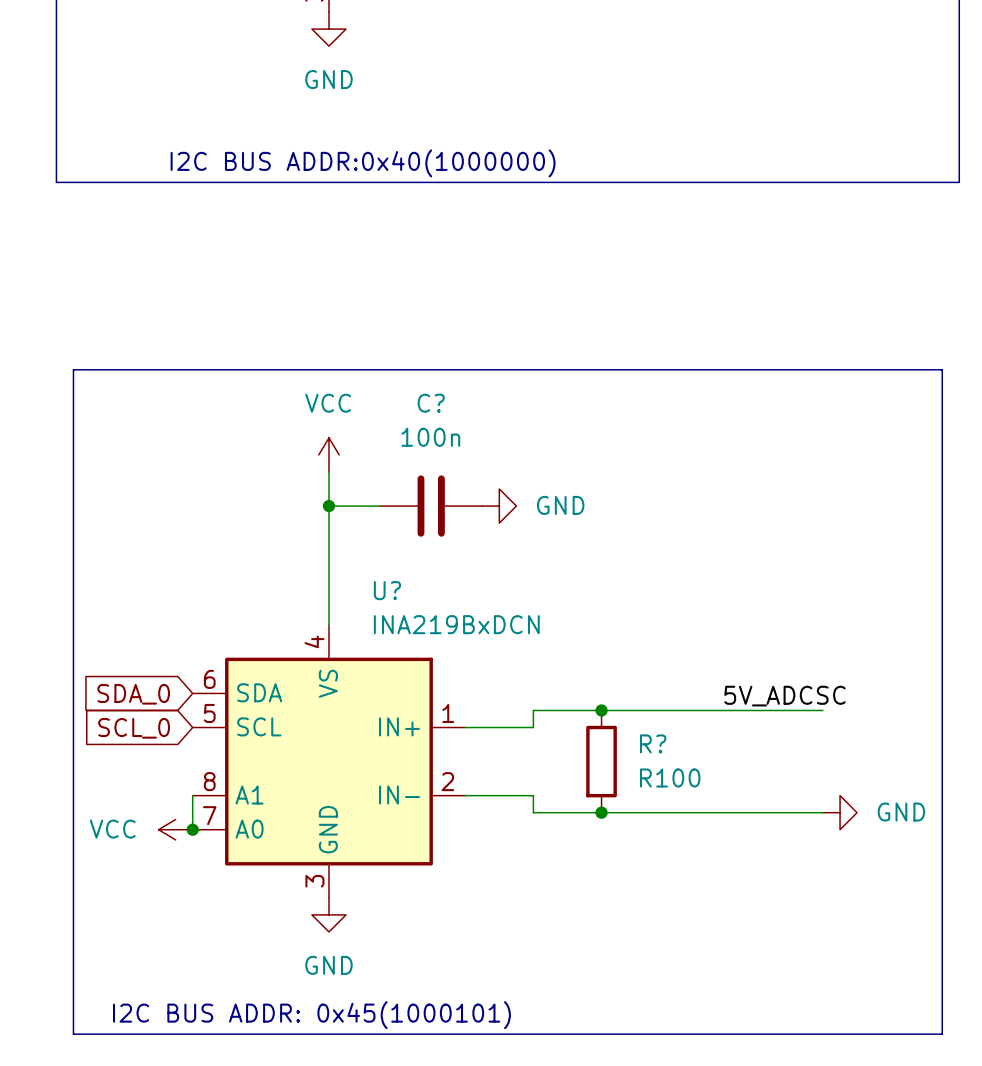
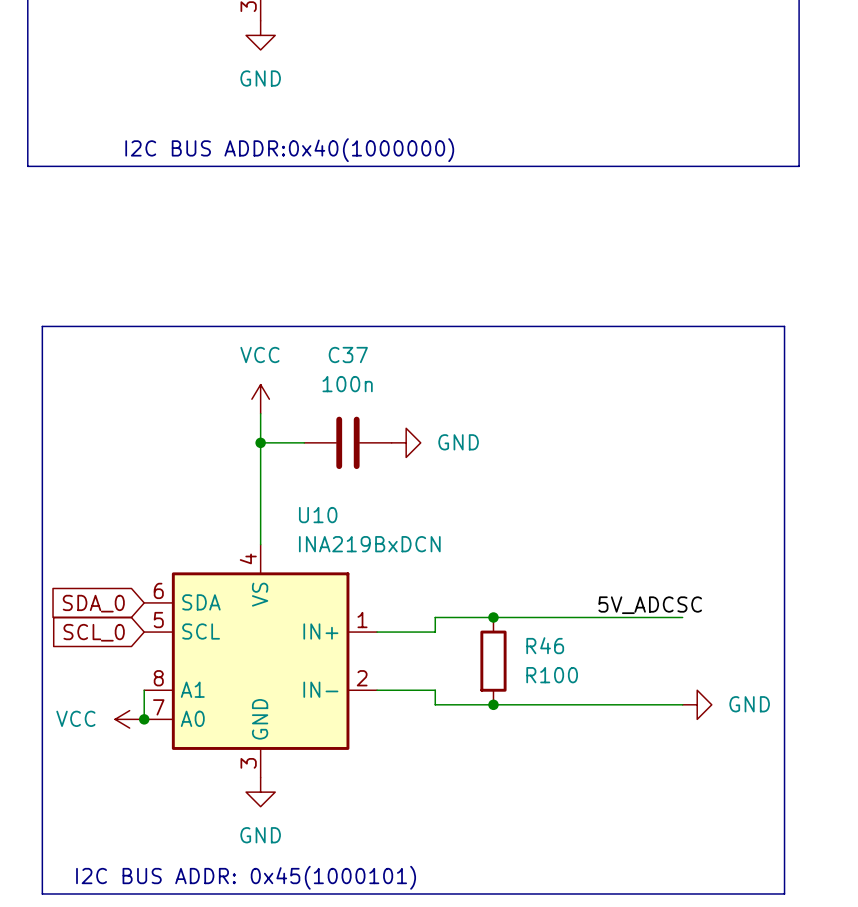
C? name: C? (431, 403) -> C37 (348, 355)
U? name: U? (387, 590) -> U10 (318, 515)
R? name: R? (653, 743) -> R46 (545, 645)

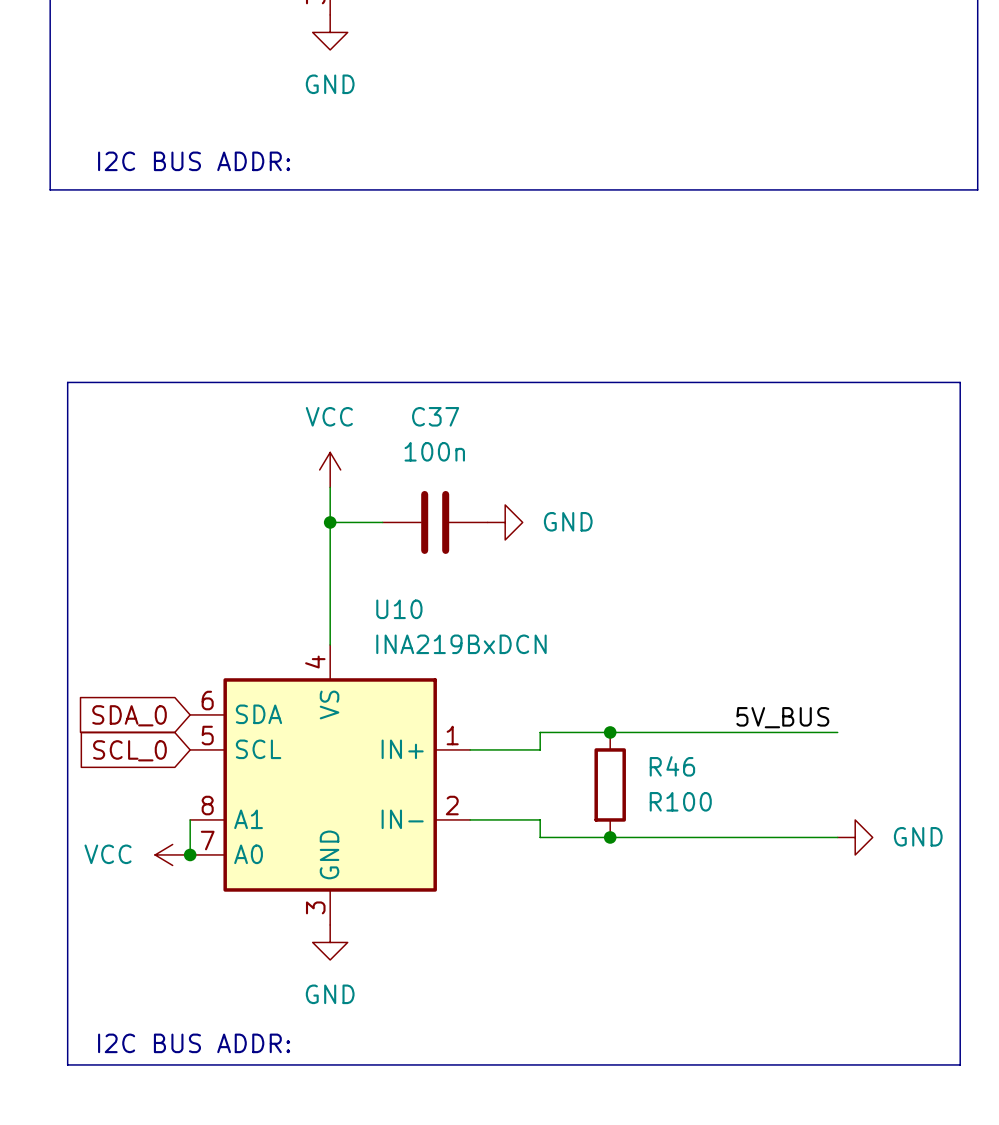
text: I2C BUS ADDR:0x40(1000000) (289, 150) -> I2C BUS ADDR: (194, 161)
label: 5V_ADCSC (650, 605) -> 5V_BUS (782, 717)
text: I2C BUS ADDR: 0x45(1000101) (246, 877) -> I2C BUS ADDR: (194, 1043)

